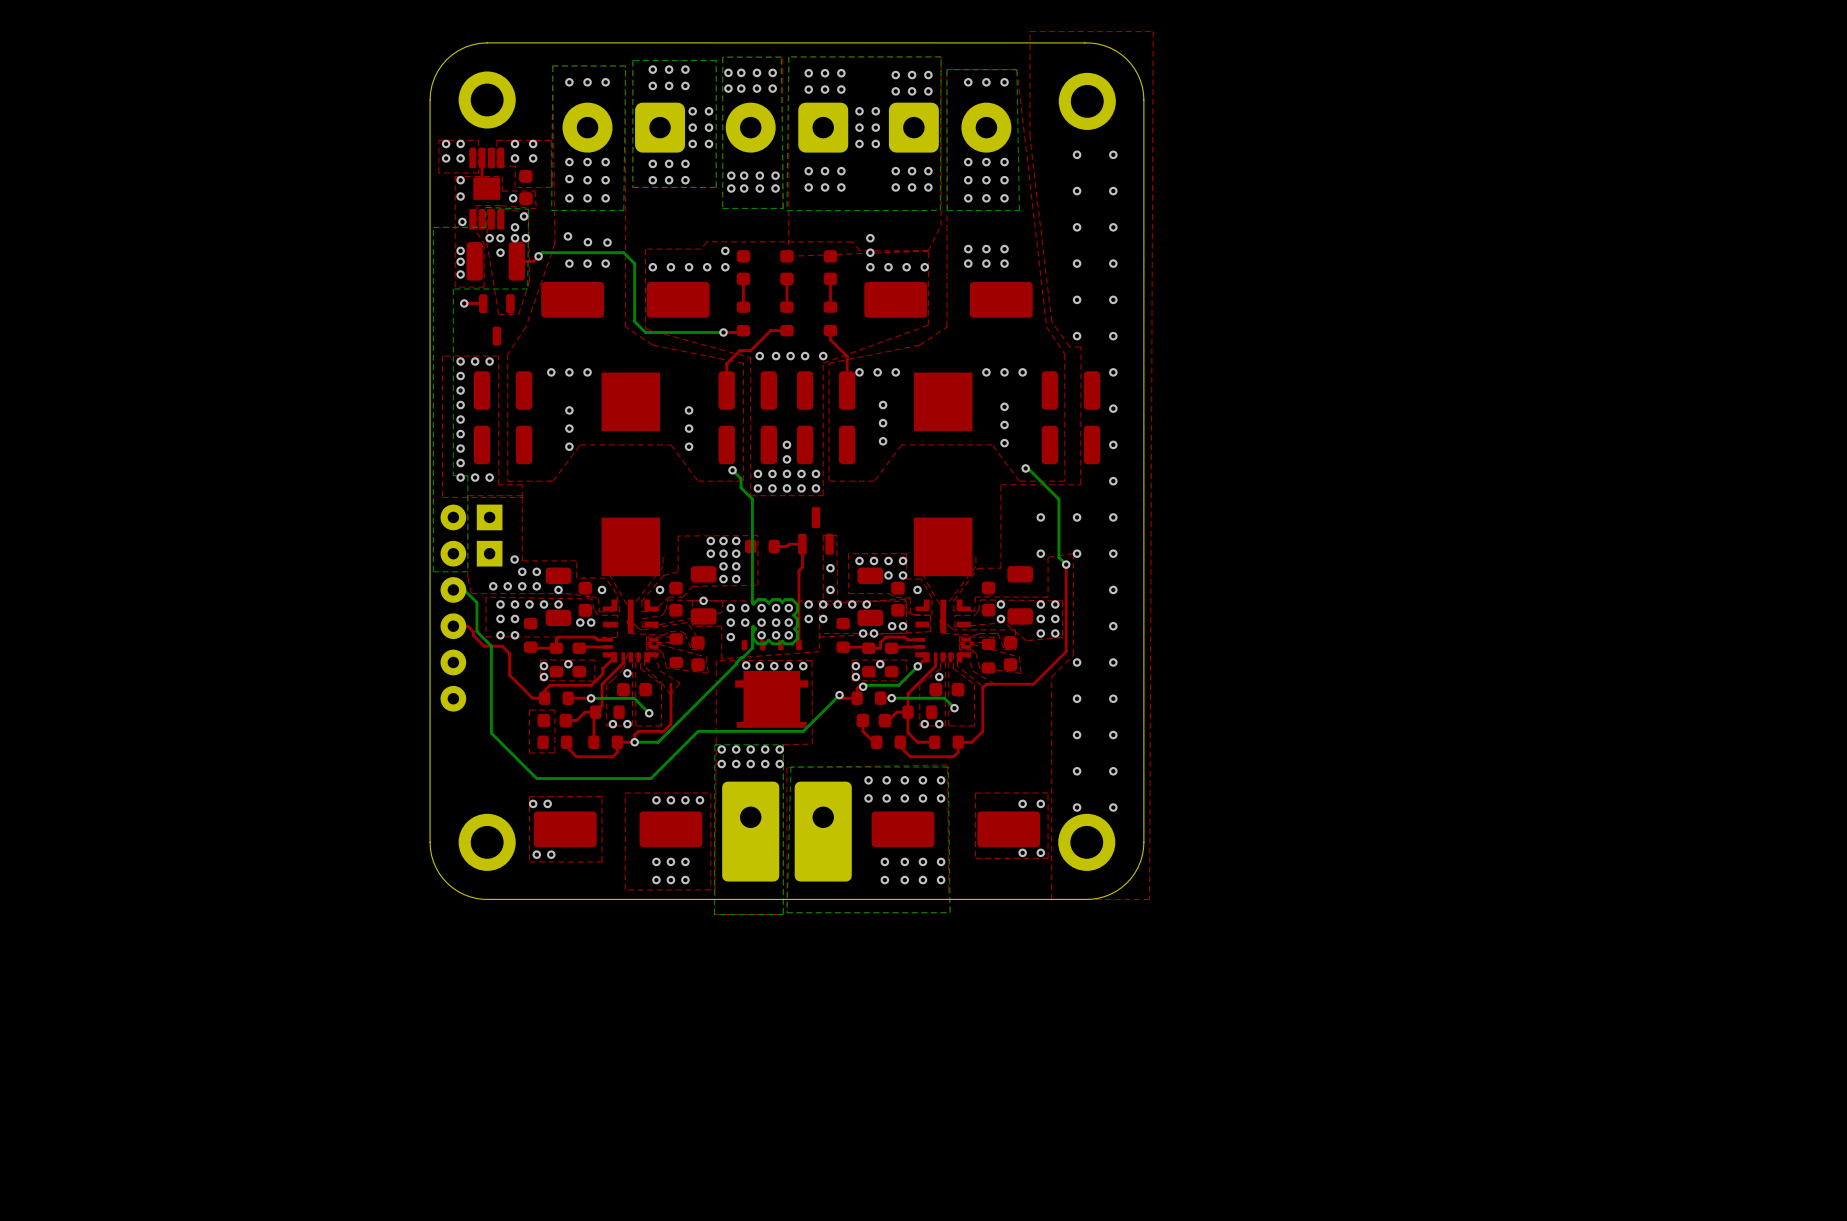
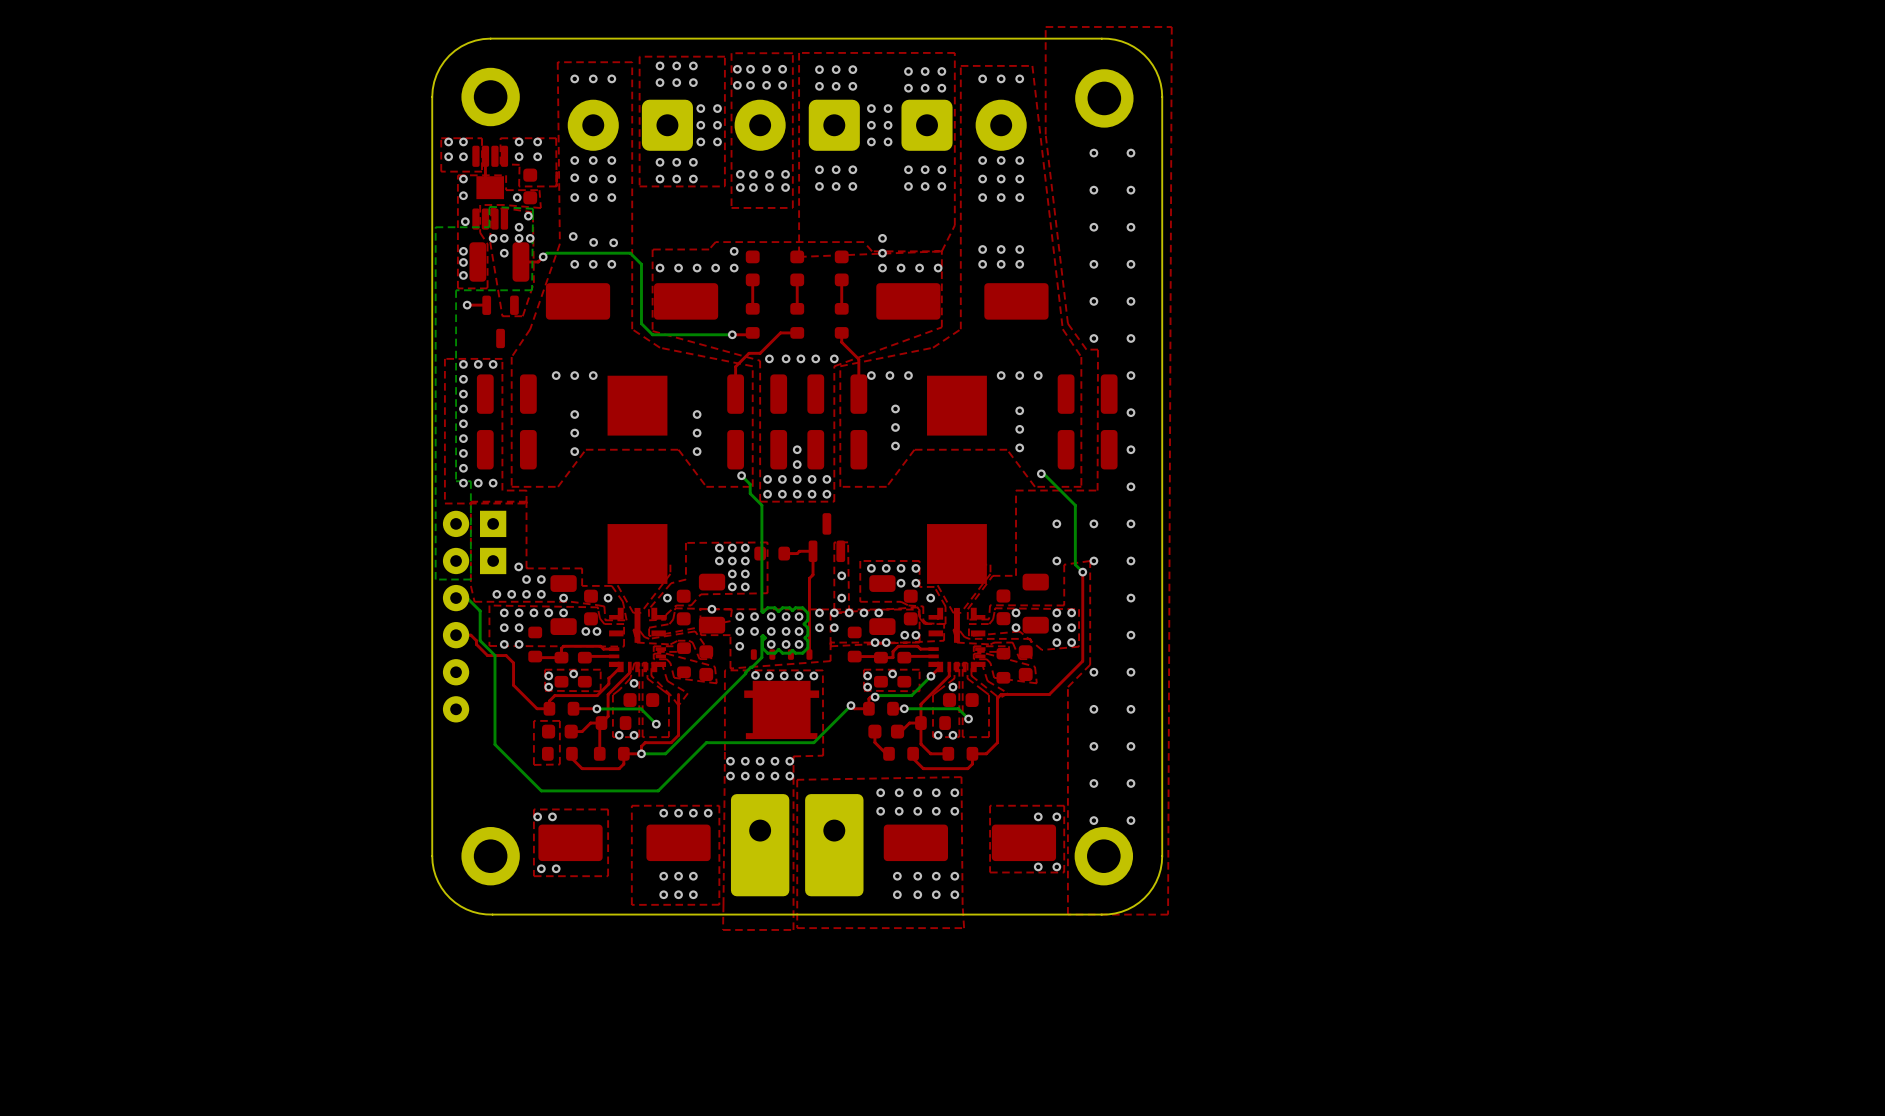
bottom zone outline: (941, 56) (788, 56) (786, 210) (940, 210) (941, 56) -> none
bottom zone outline: (781, 57) (783, 208) (722, 208) (722, 57) (781, 57) -> none
bottom zone outline: (716, 60) (632, 60) (632, 187) (716, 187) (716, 60) -> none
bottom zone outline: (625, 65) (552, 65) (551, 210) (623, 210) (625, 65) -> none
bottom zone outline: (1016, 69) (946, 69) (947, 210) (1019, 210) (1016, 69) -> none
bottom zone outline: (783, 744) (714, 744) (714, 914) (783, 914) (783, 744) -> none
bottom zone outline: (948, 767) (790, 766) (786, 912) (950, 912) (948, 767) -> none

